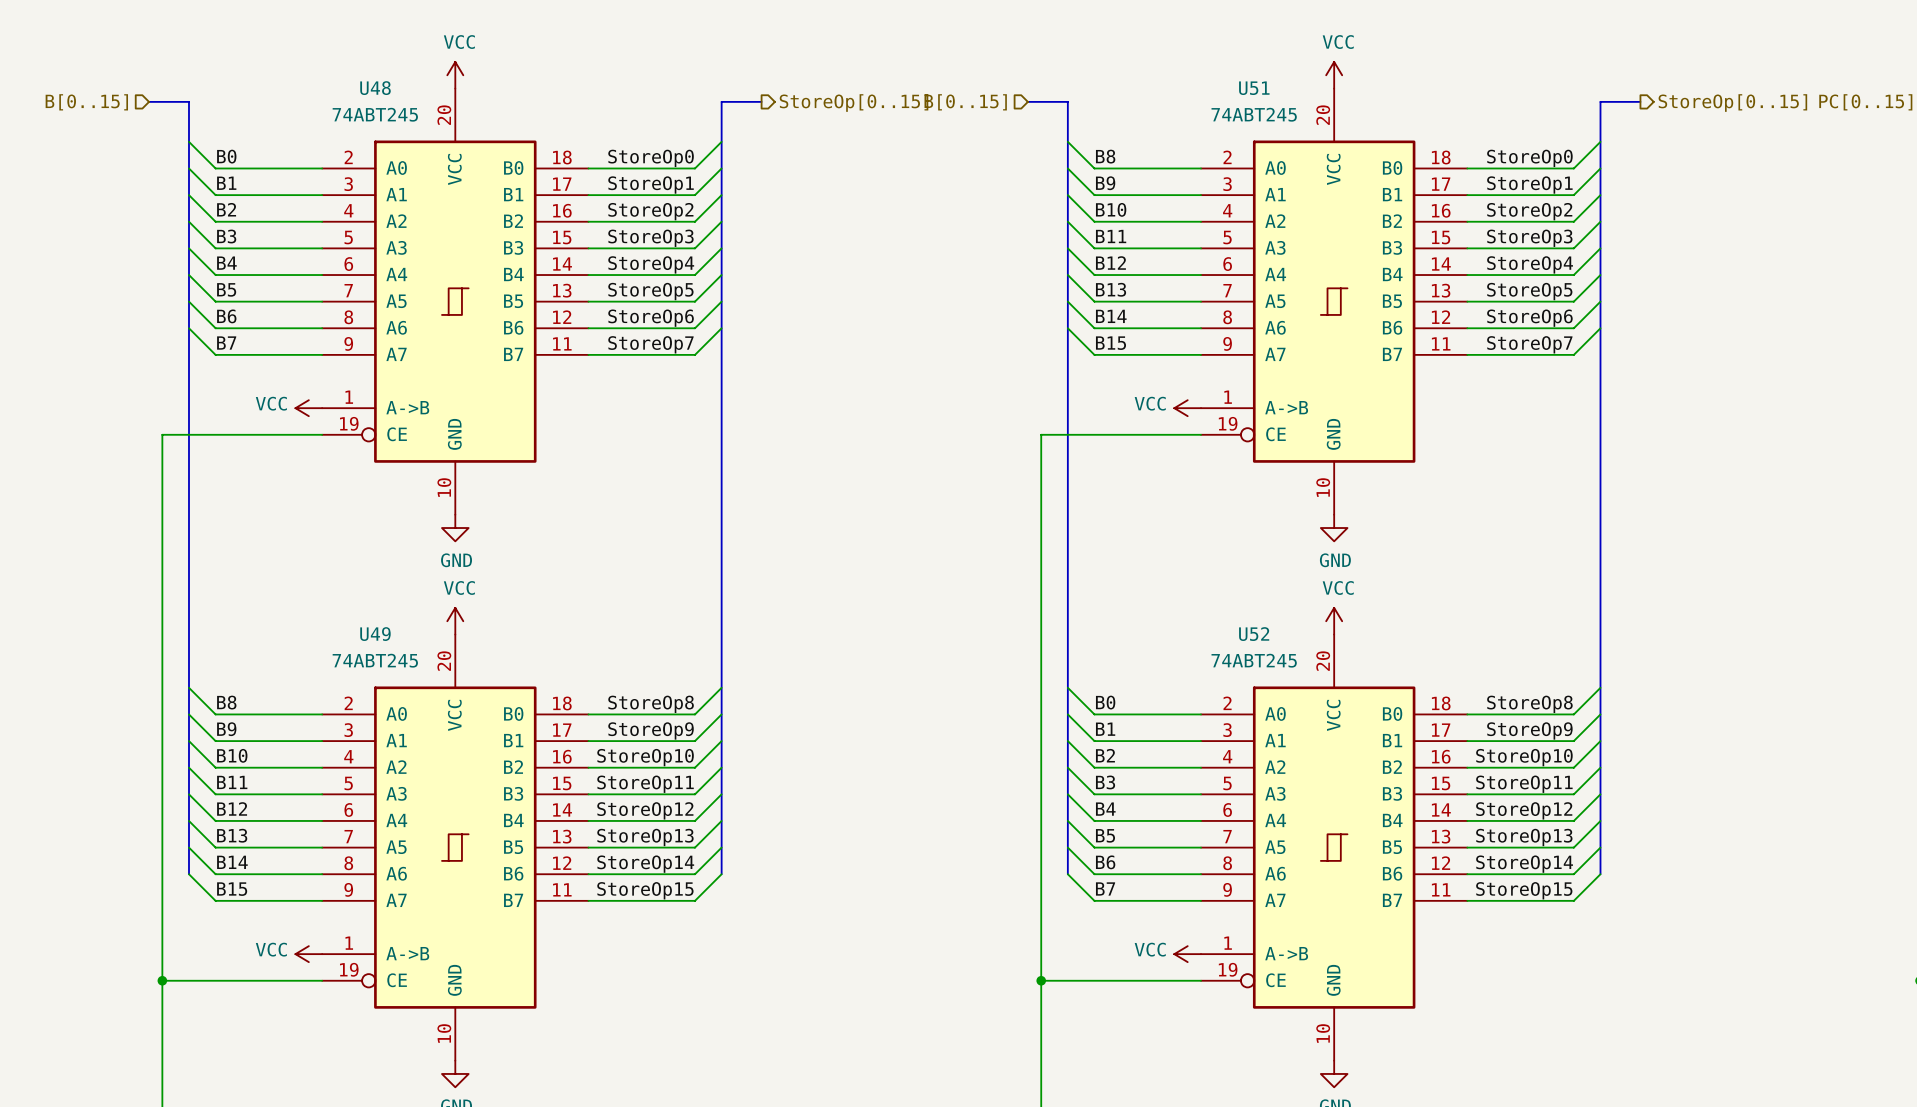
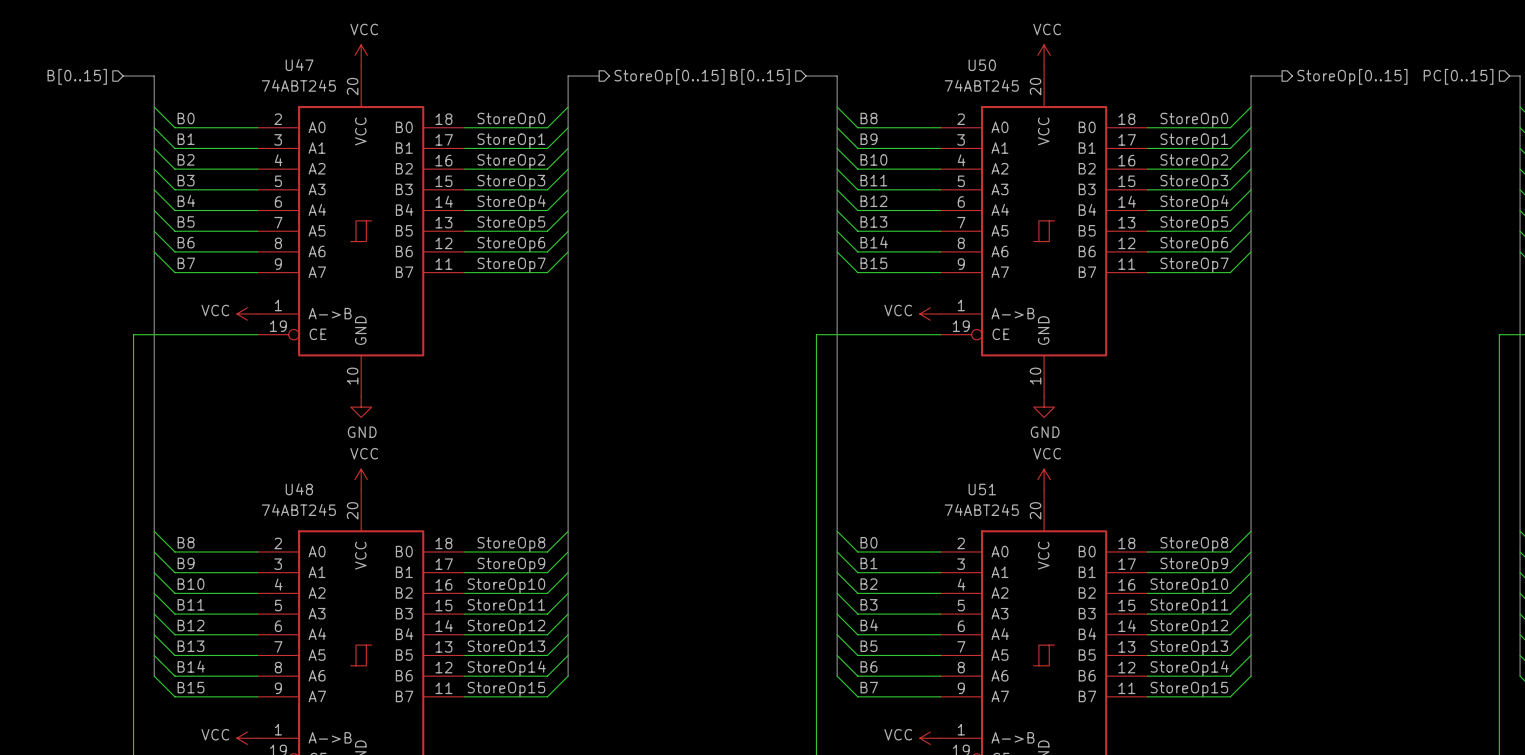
U48 name: U48 (375, 88) -> U47 (299, 65)
U51 name: U51 (1254, 88) -> U50 (982, 65)
U49 name: U49 (375, 634) -> U48 (299, 489)
U52 name: U52 (1254, 634) -> U51 (982, 489)

